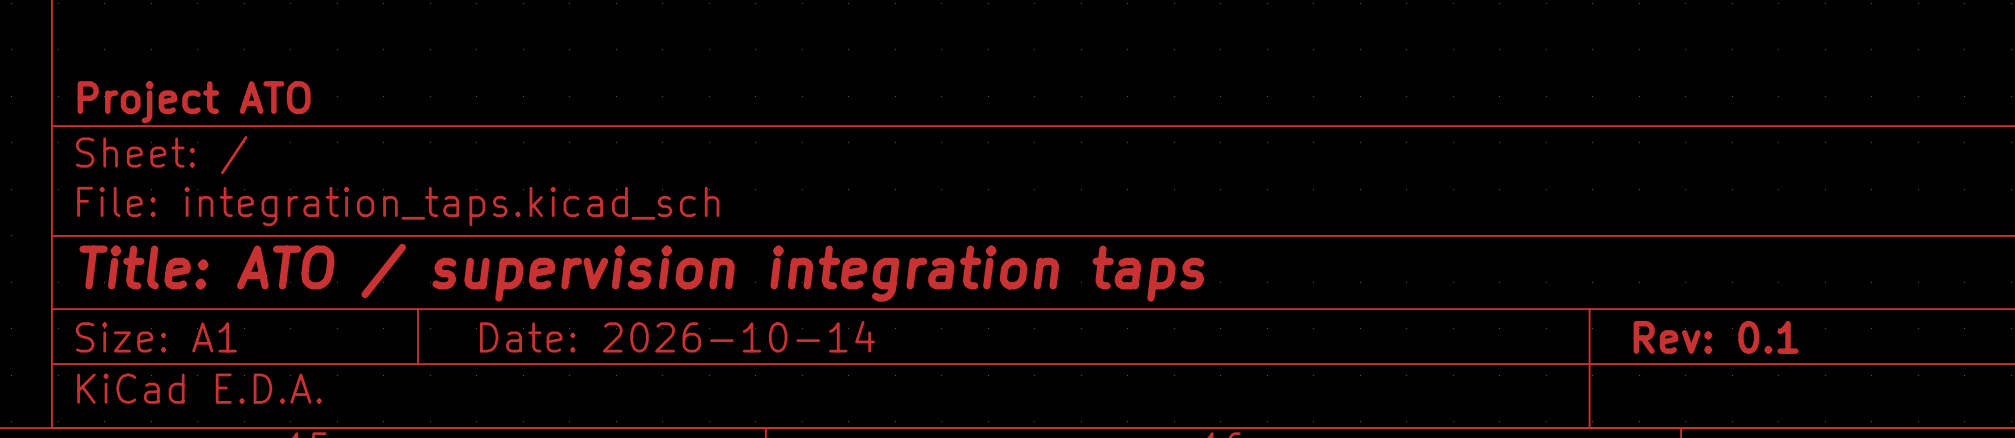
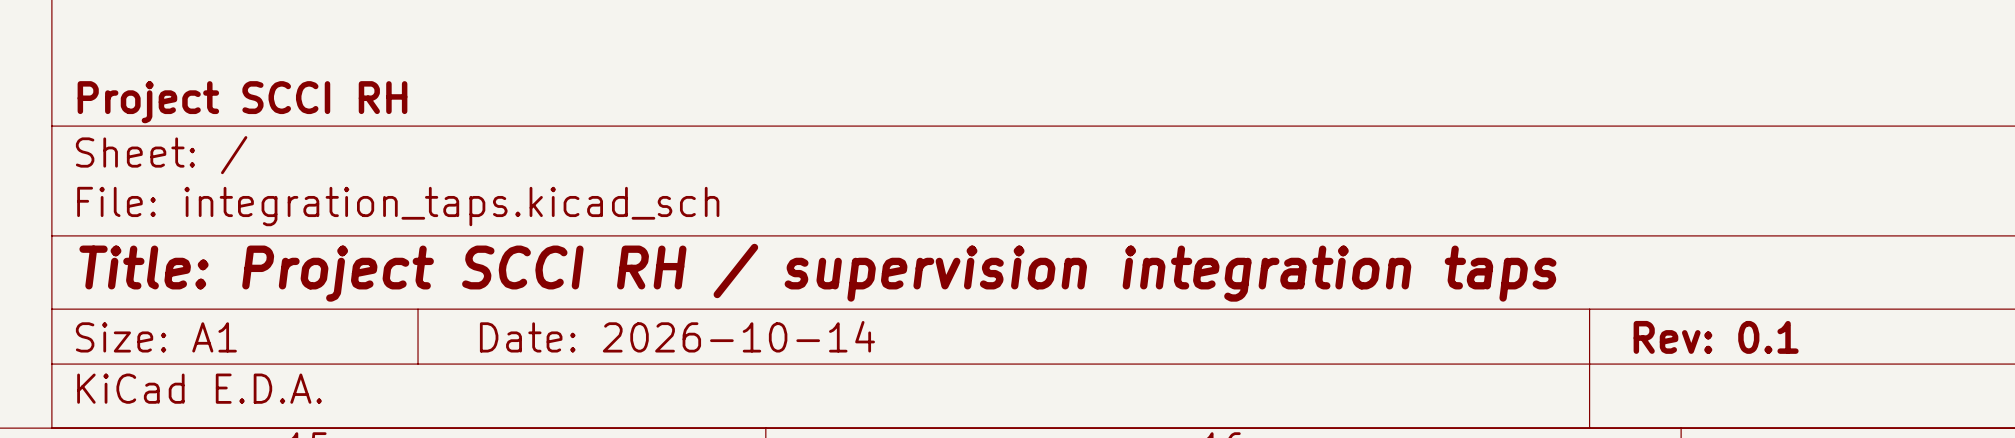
title block: Project ATO (194, 102) -> Project SCCI RH (242, 102)
title block: Title: ATO / supervision integration taps (641, 272) -> Title: Project SCCI RH / supervision integration taps (817, 272)

